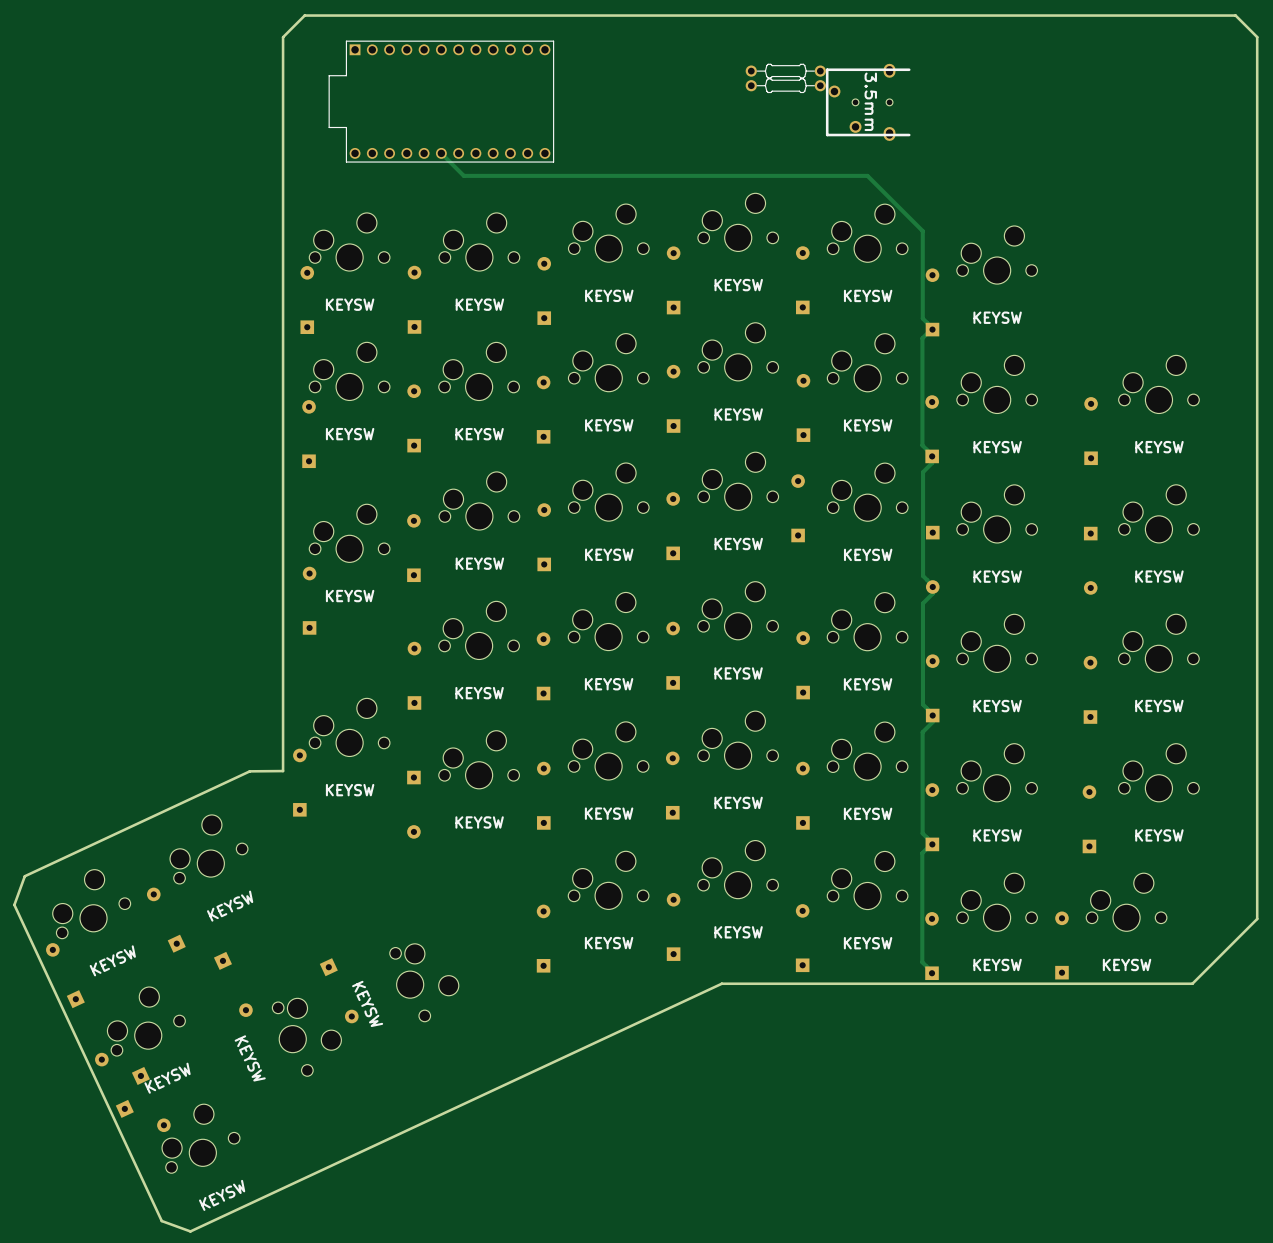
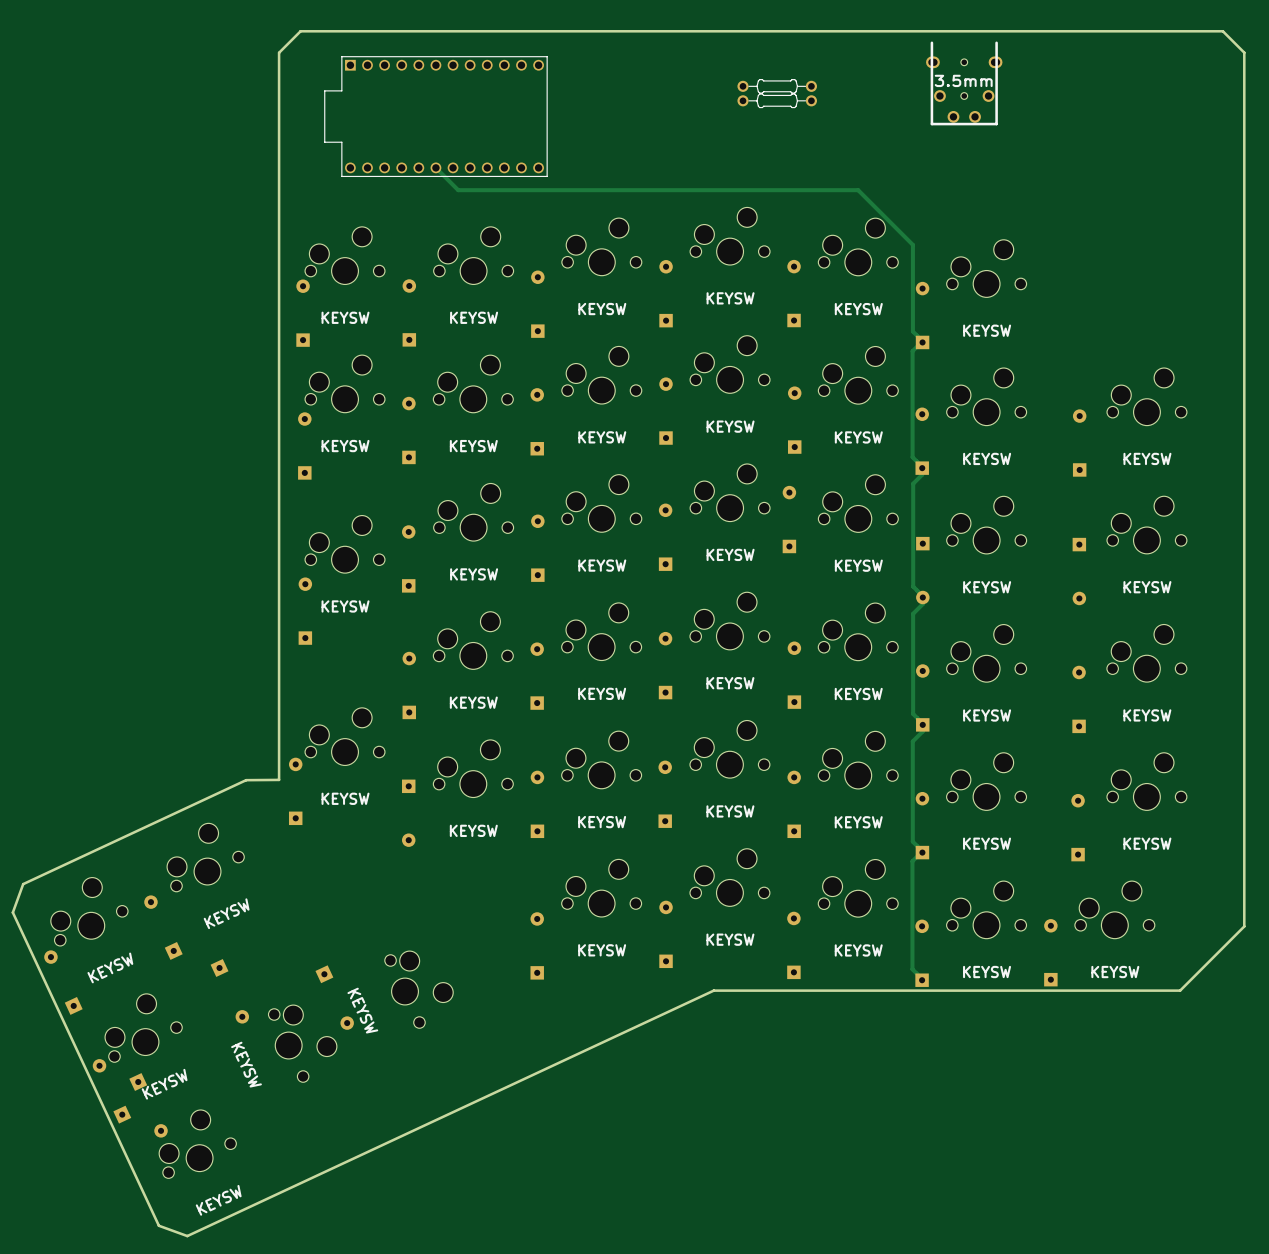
part: none -> (964, 83)
part: (868, 102) -> none

